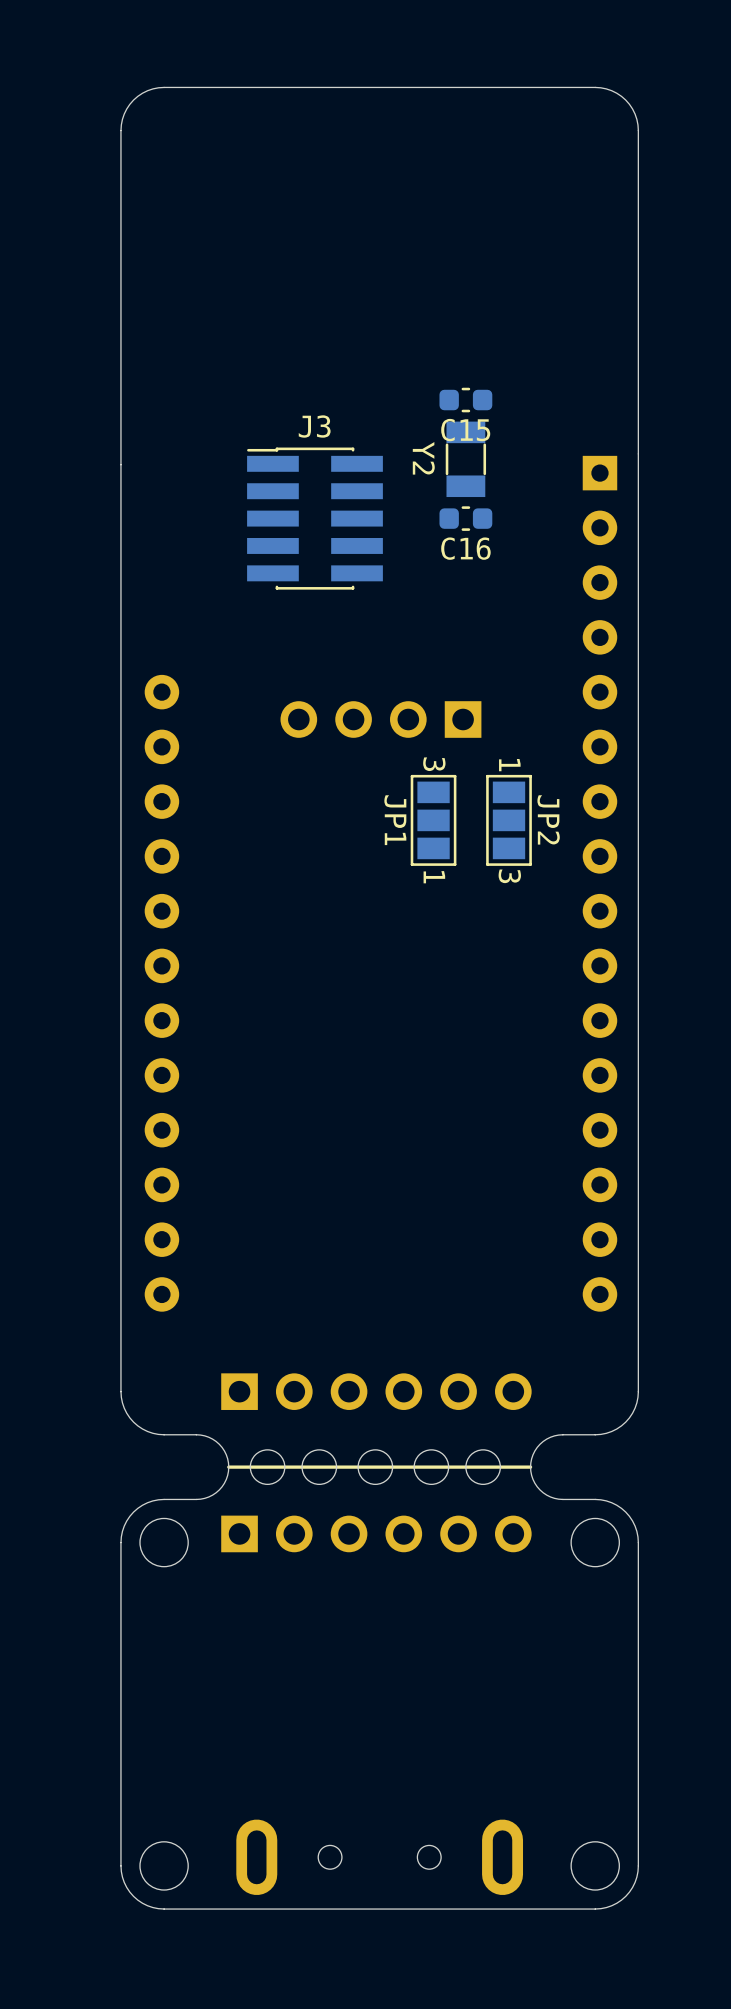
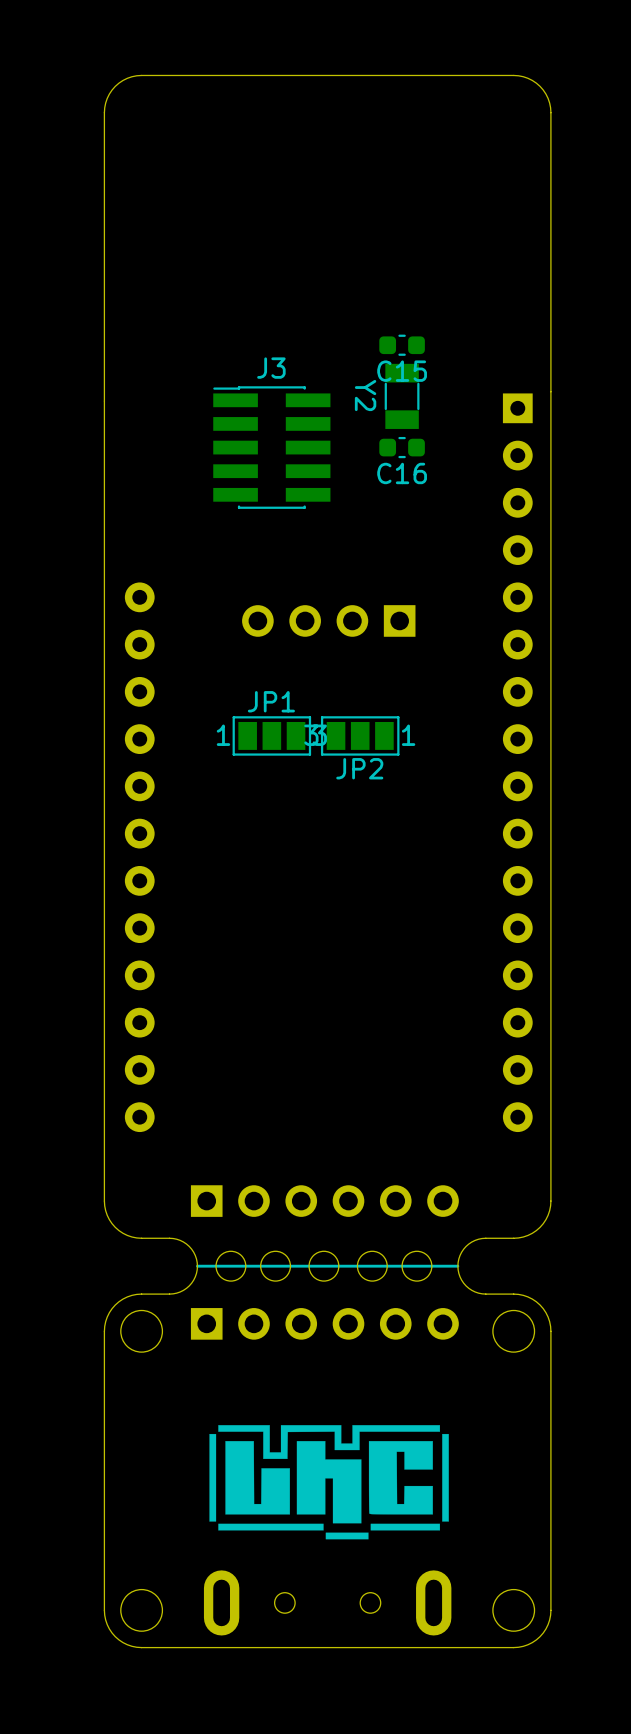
JP1 rotation: 0° (433, 820) -> 90° clockwise (271, 735)
JP1 position: (433, 820) -> (271, 735)
JP2 rotation: 0° (509, 820) -> 90° clockwise (360, 735)
JP2 position: (509, 820) -> (360, 735)
drawing: none -> [209, 1425, 449, 1540]

